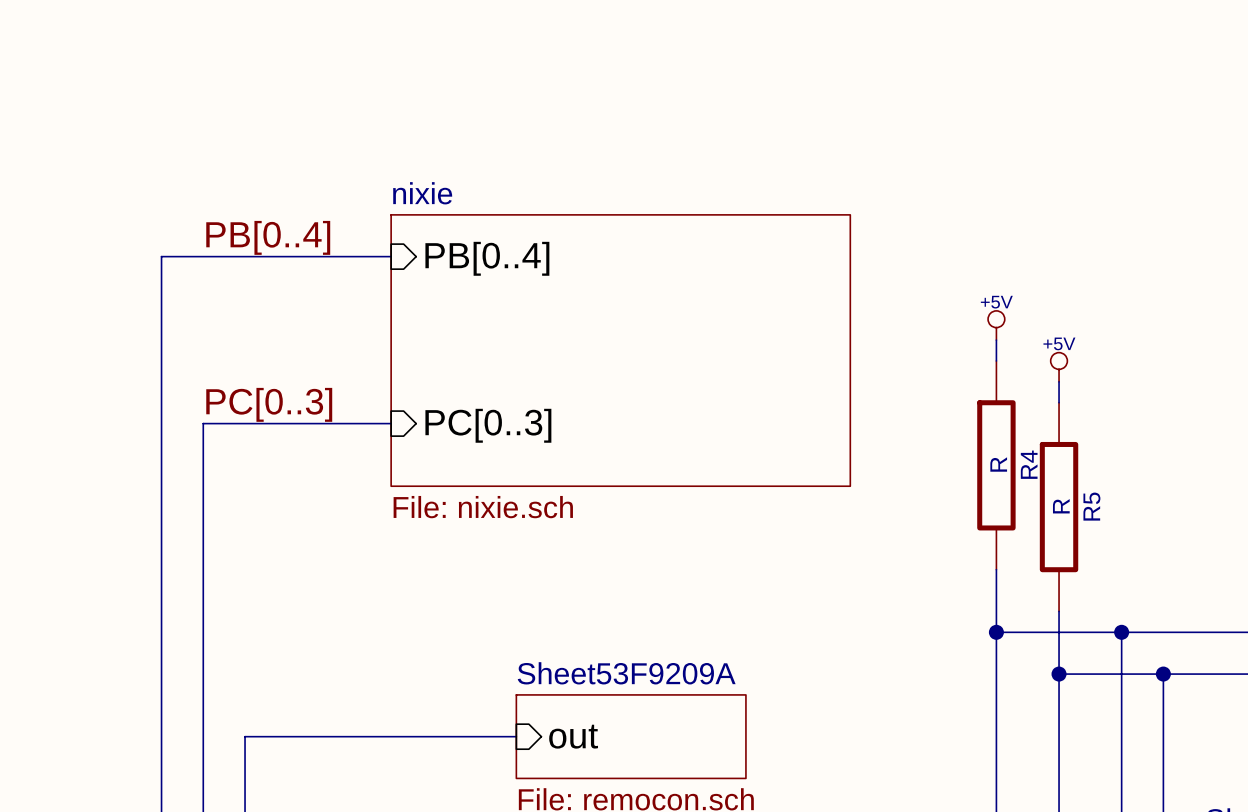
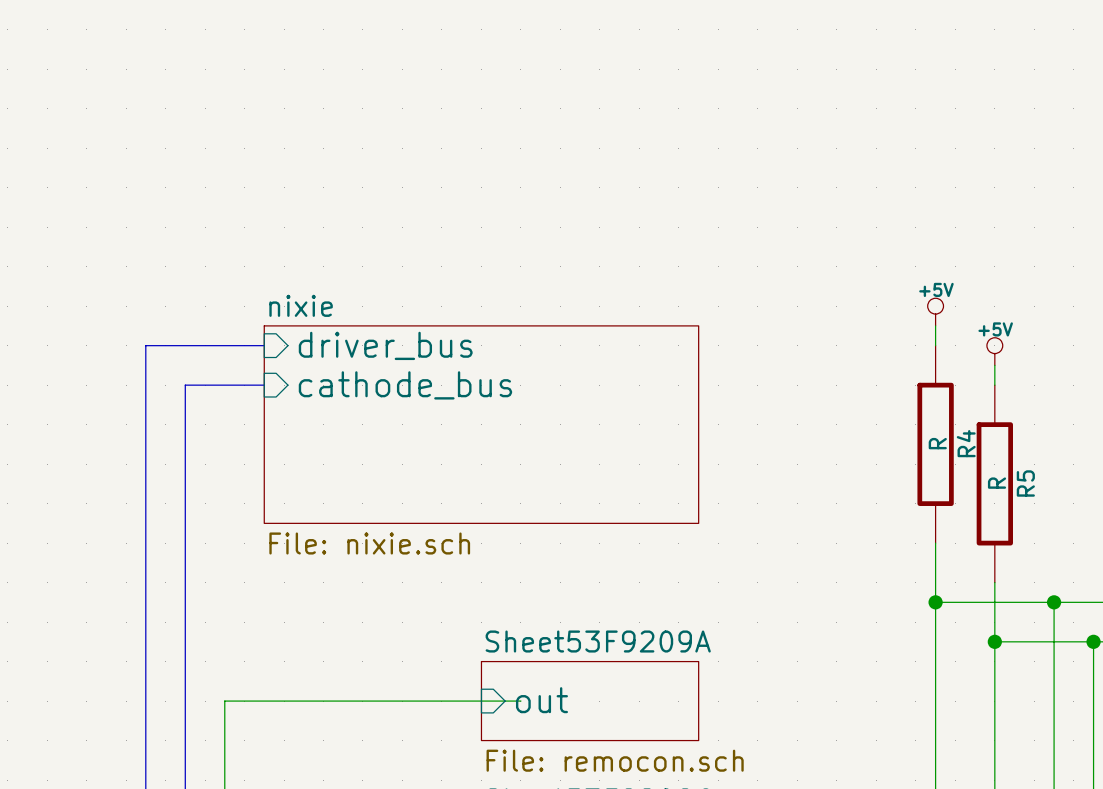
label: PB[0..4] (268, 237) -> none
bus: (391, 256) (161, 256) (161, 360) -> (264, 345) (145, 345)
sheet pin: PB[0..4] (487, 258) -> none
sheet nixie: File: nixie.sch (620, 350) -> none
sheet pin: none -> driver_bus (385, 345)
label: PC[0..3] (269, 404) -> none
sheet pin: none -> cathode_bus (405, 385)
bus: (203, 423) (391, 423) -> (185, 404) (185, 385) (264, 385)
sheet pin: PC[0..3] (488, 425) -> none
sheet nixie: none -> File: nixie.sch (481, 424)
wire: none -> (481, 701) (520, 701)

